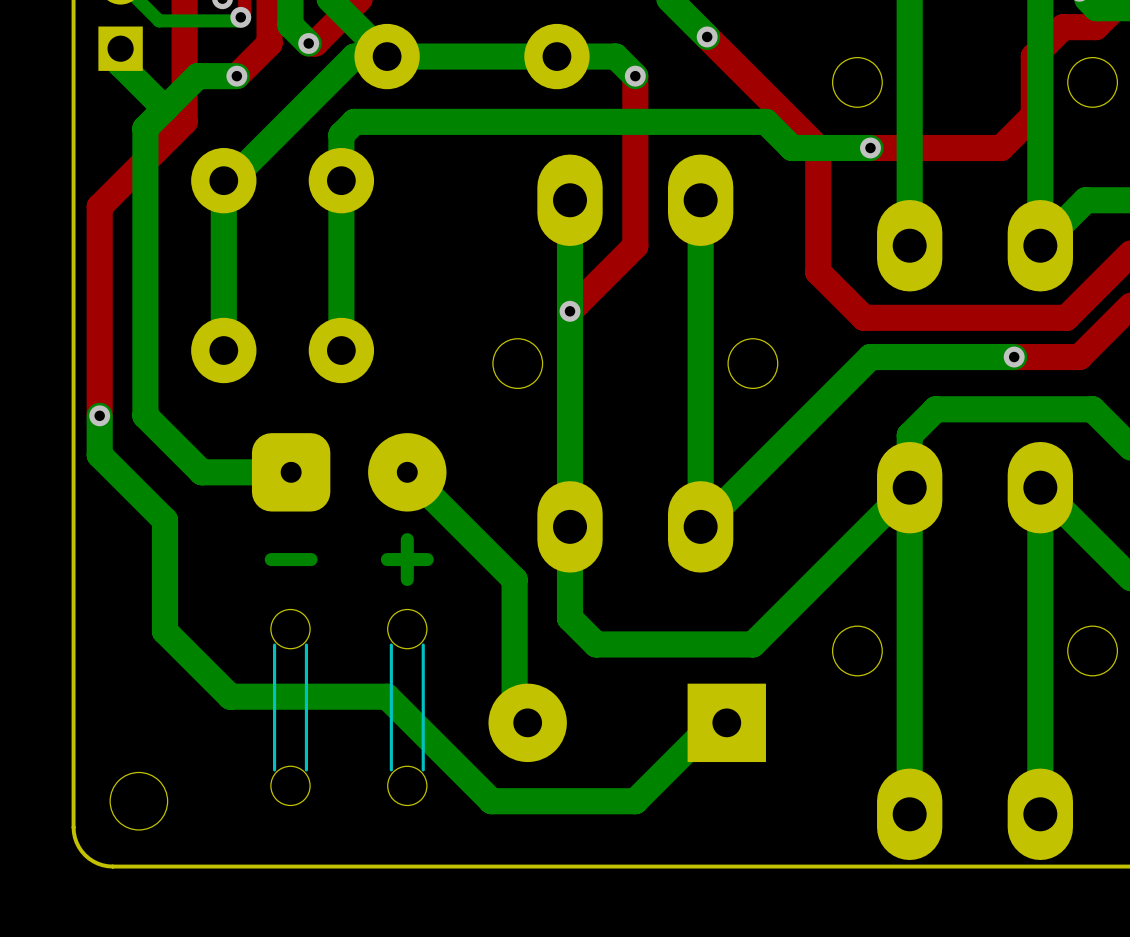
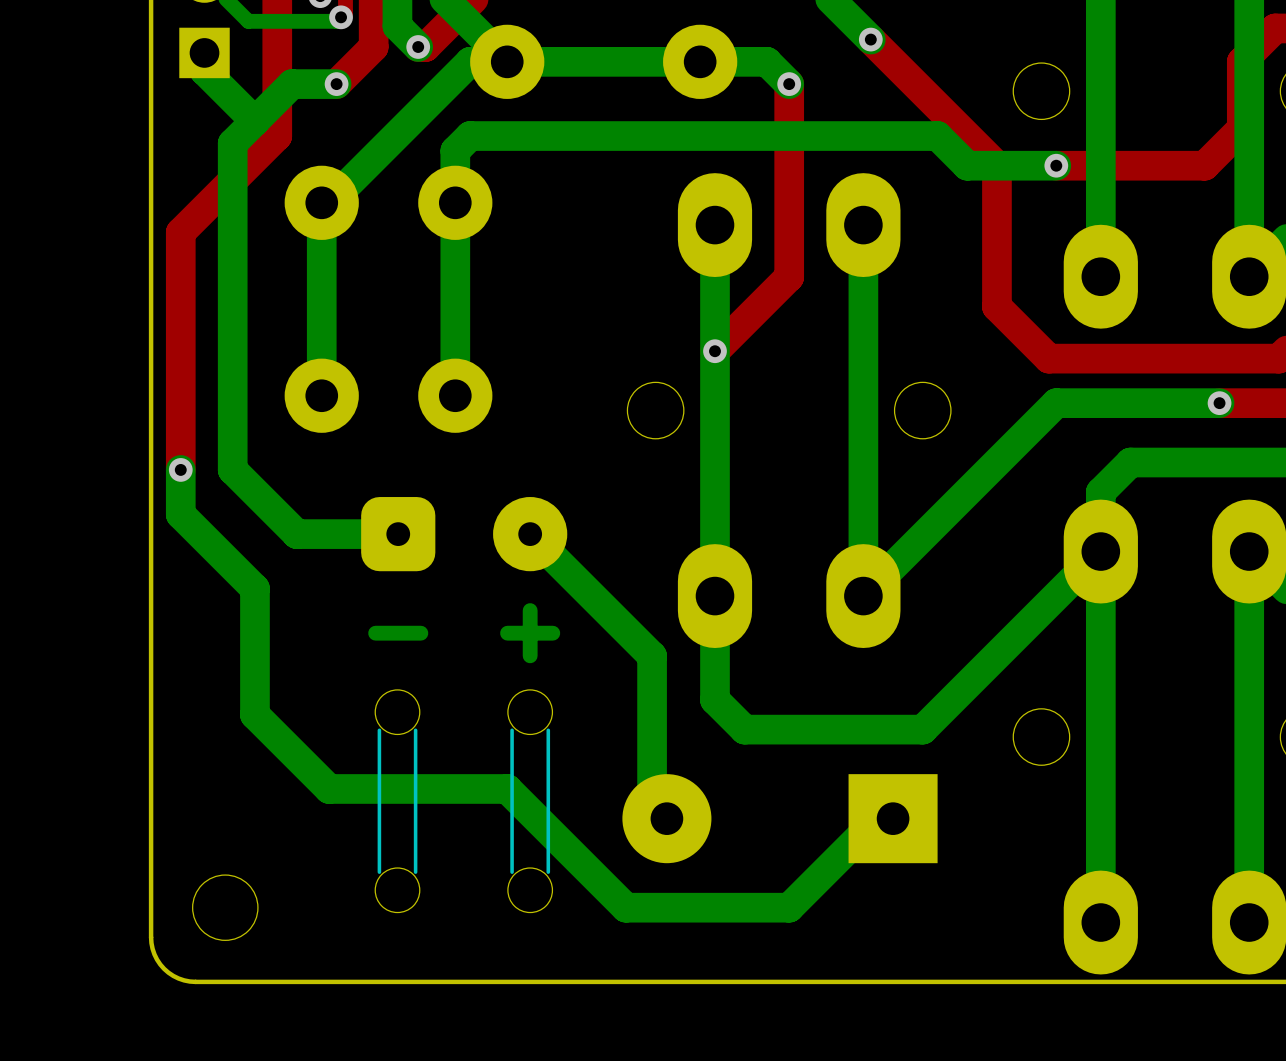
part footprint: [251, 433, 447, 806] -> [361, 497, 568, 913]

